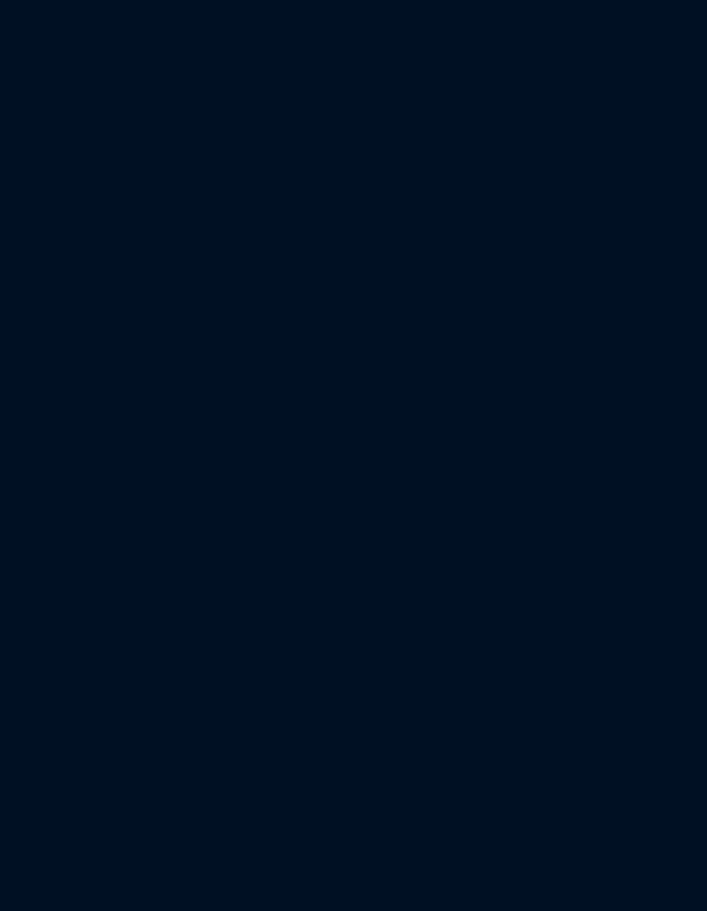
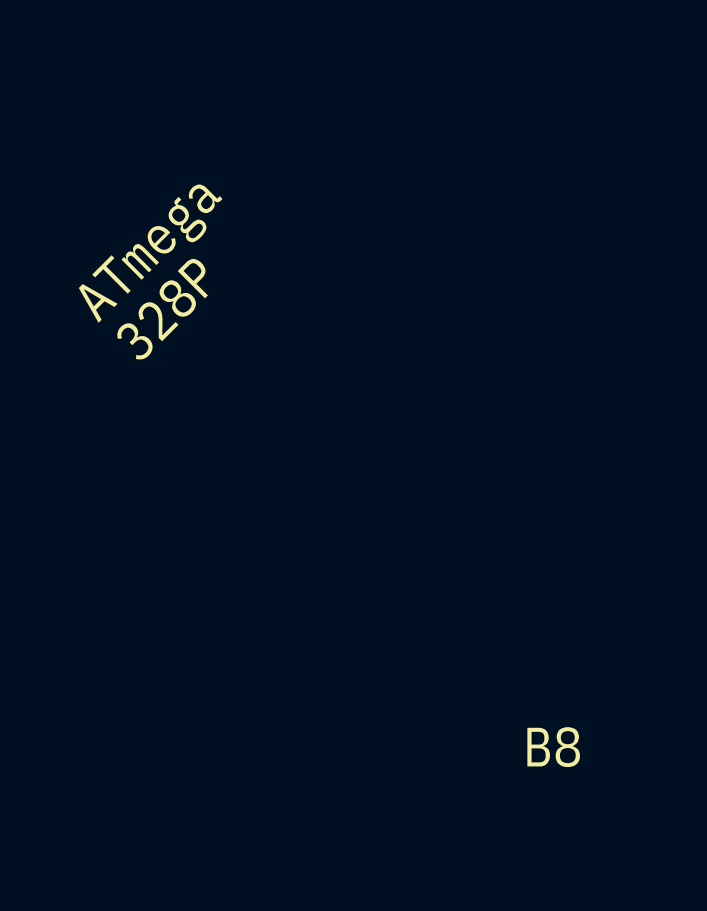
text: none -> ATmega (150, 253)
text: none -> 328P (162, 309)
text: none -> B8 (553, 747)

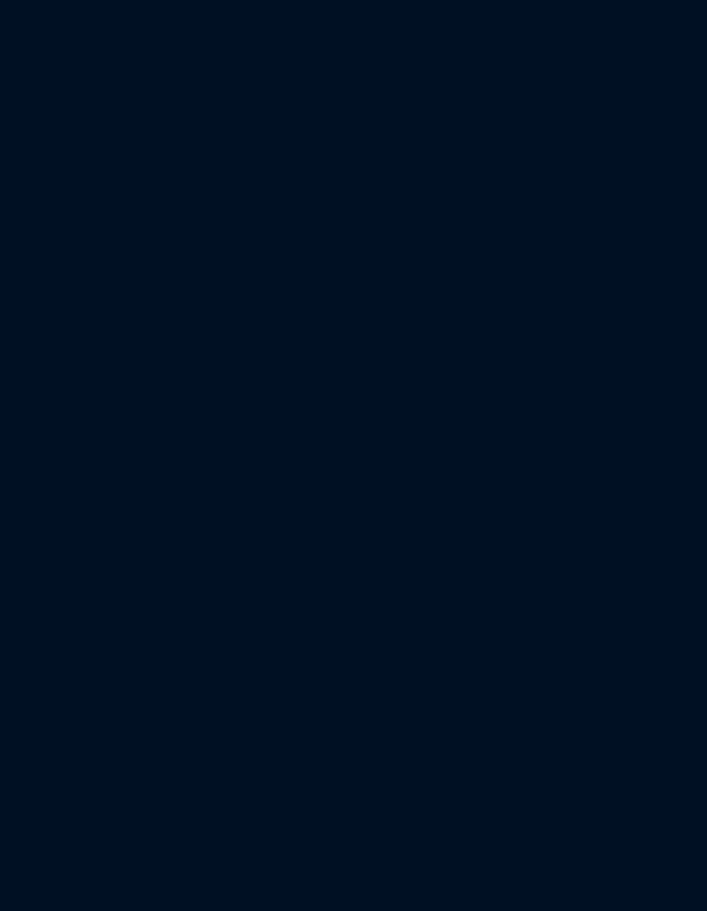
text: ATmega (150, 253) -> none
text: 328P (162, 309) -> none
text: B8 (553, 747) -> none

